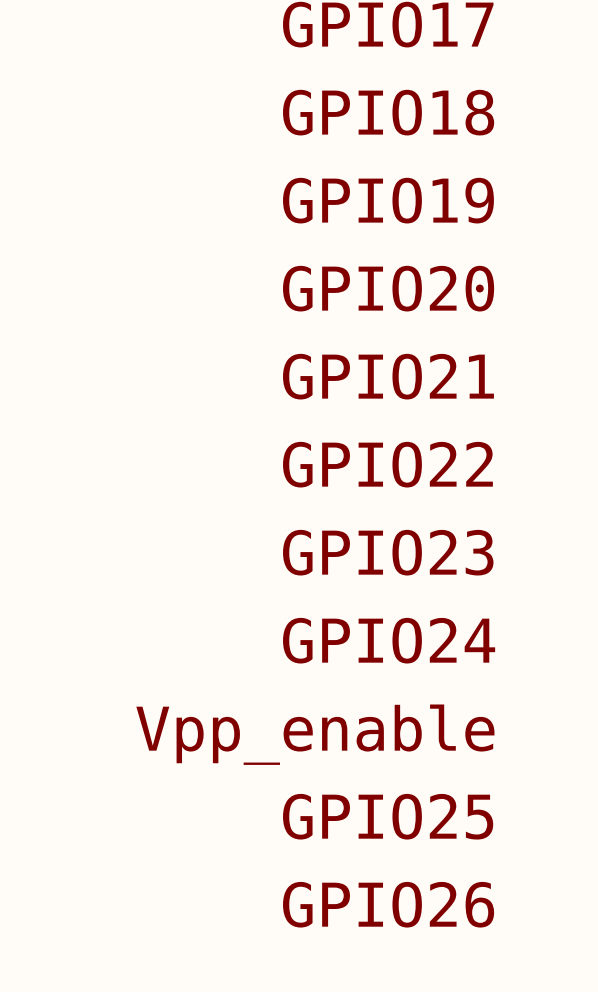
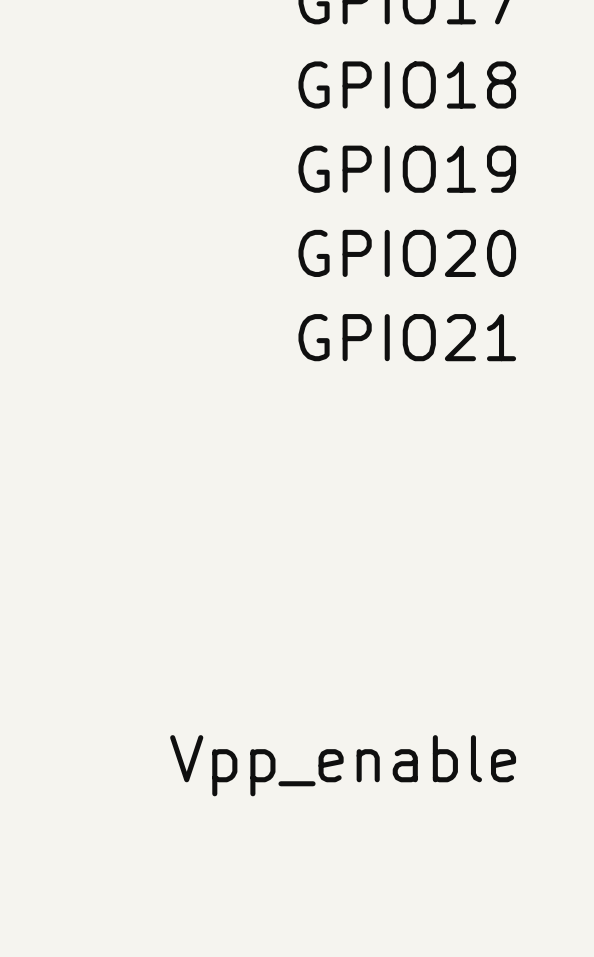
label: GPIO22 (387, 464) -> none
label: GPIO23 (388, 552) -> none
label: GPIO24 (389, 640) -> none
label: Vpp_enable (315, 734) -> none
label: GPIO25 (388, 816) -> Vpp_enable (343, 765)
label: GPIO26 (388, 904) -> none

